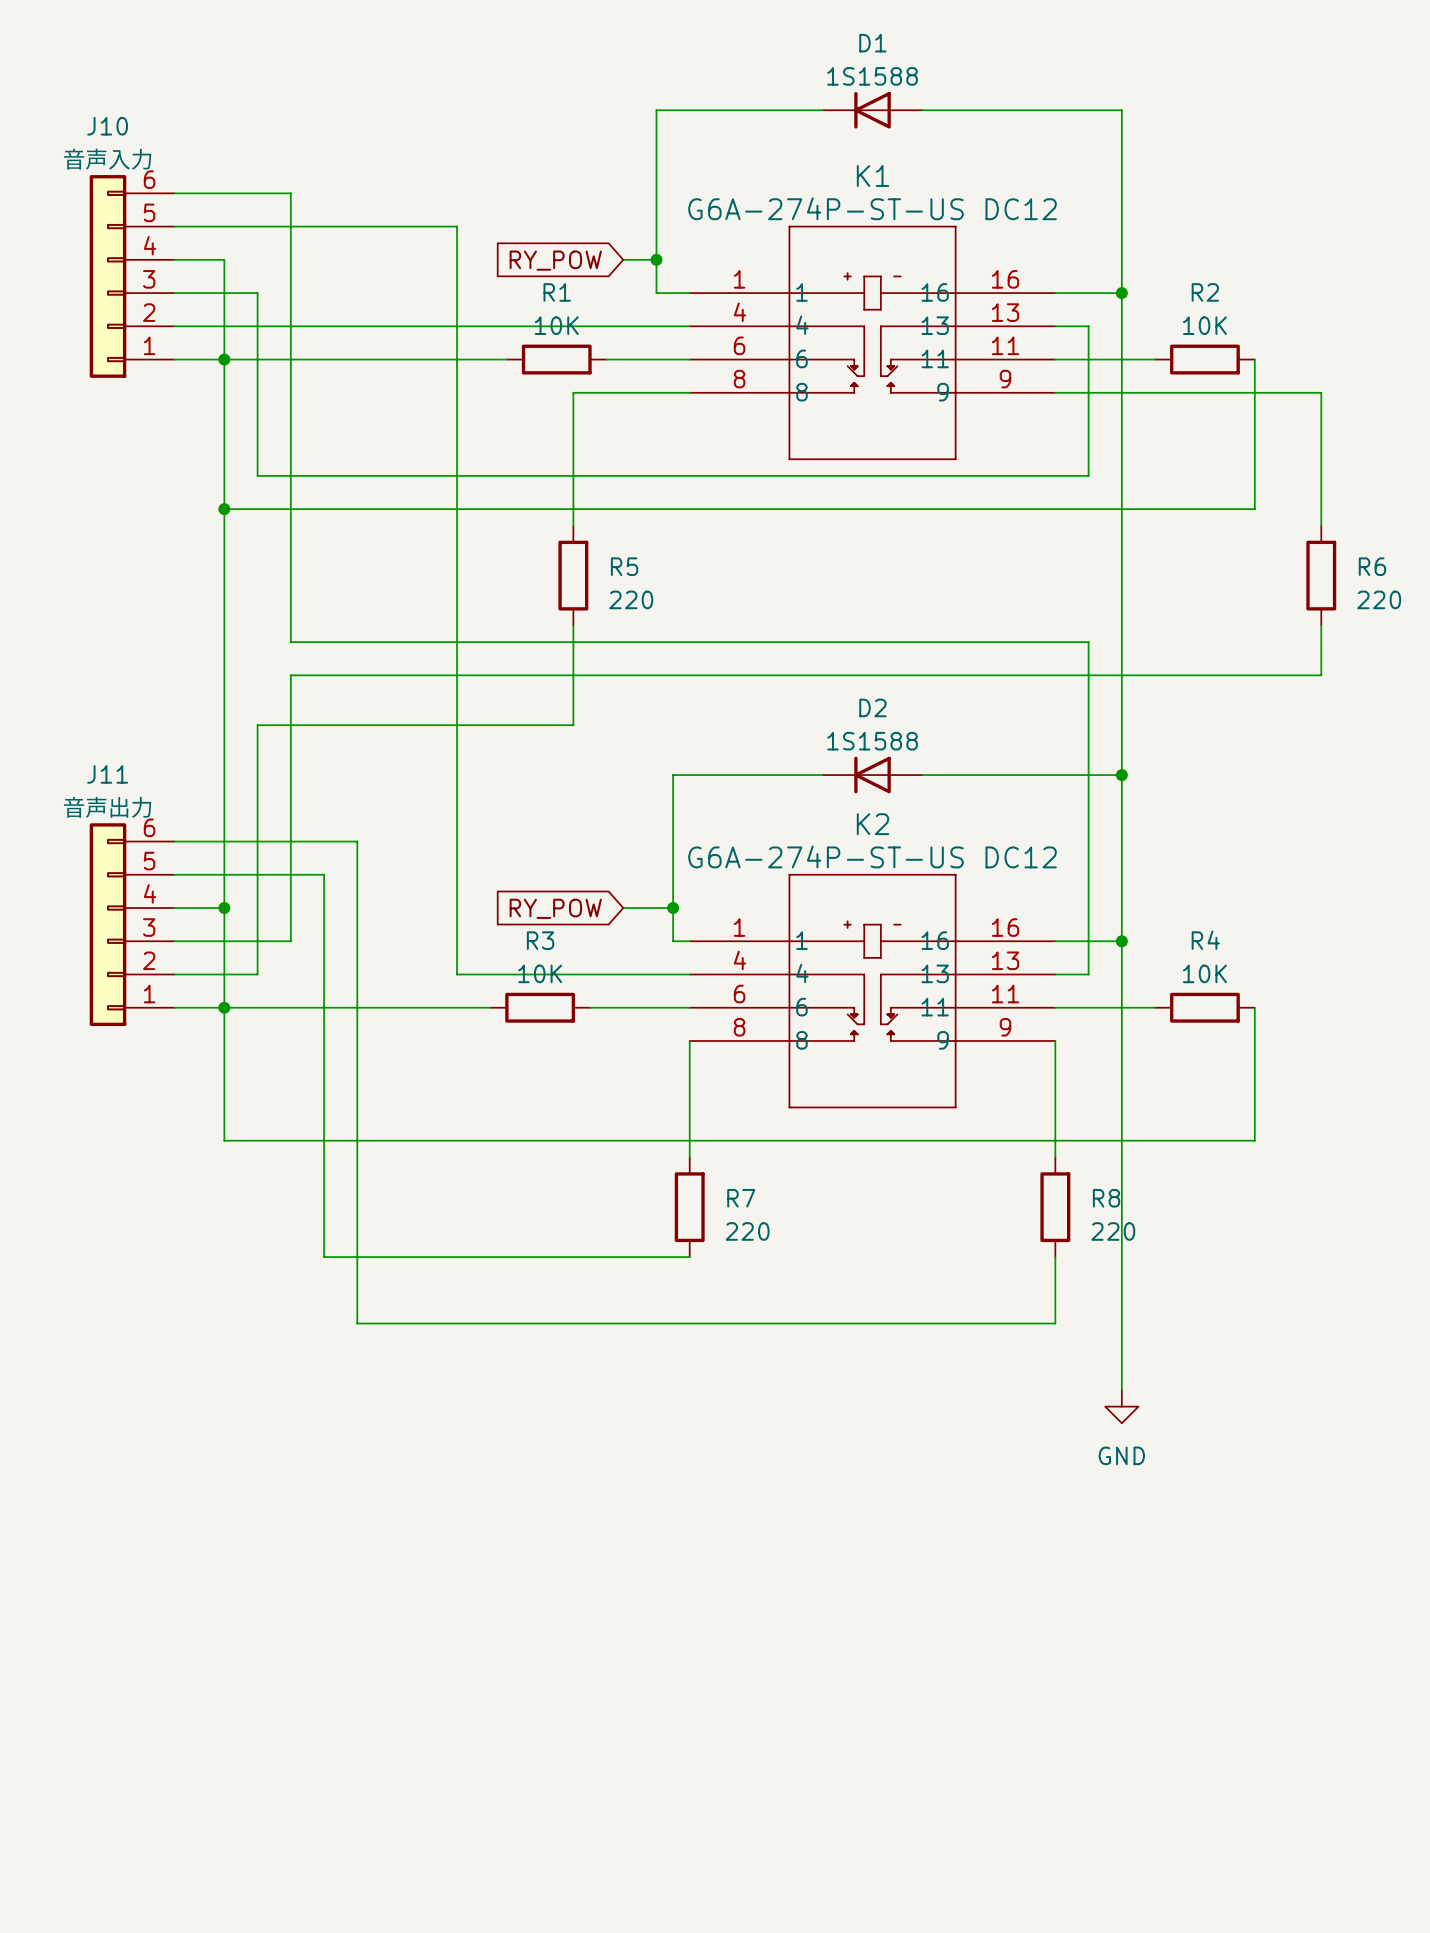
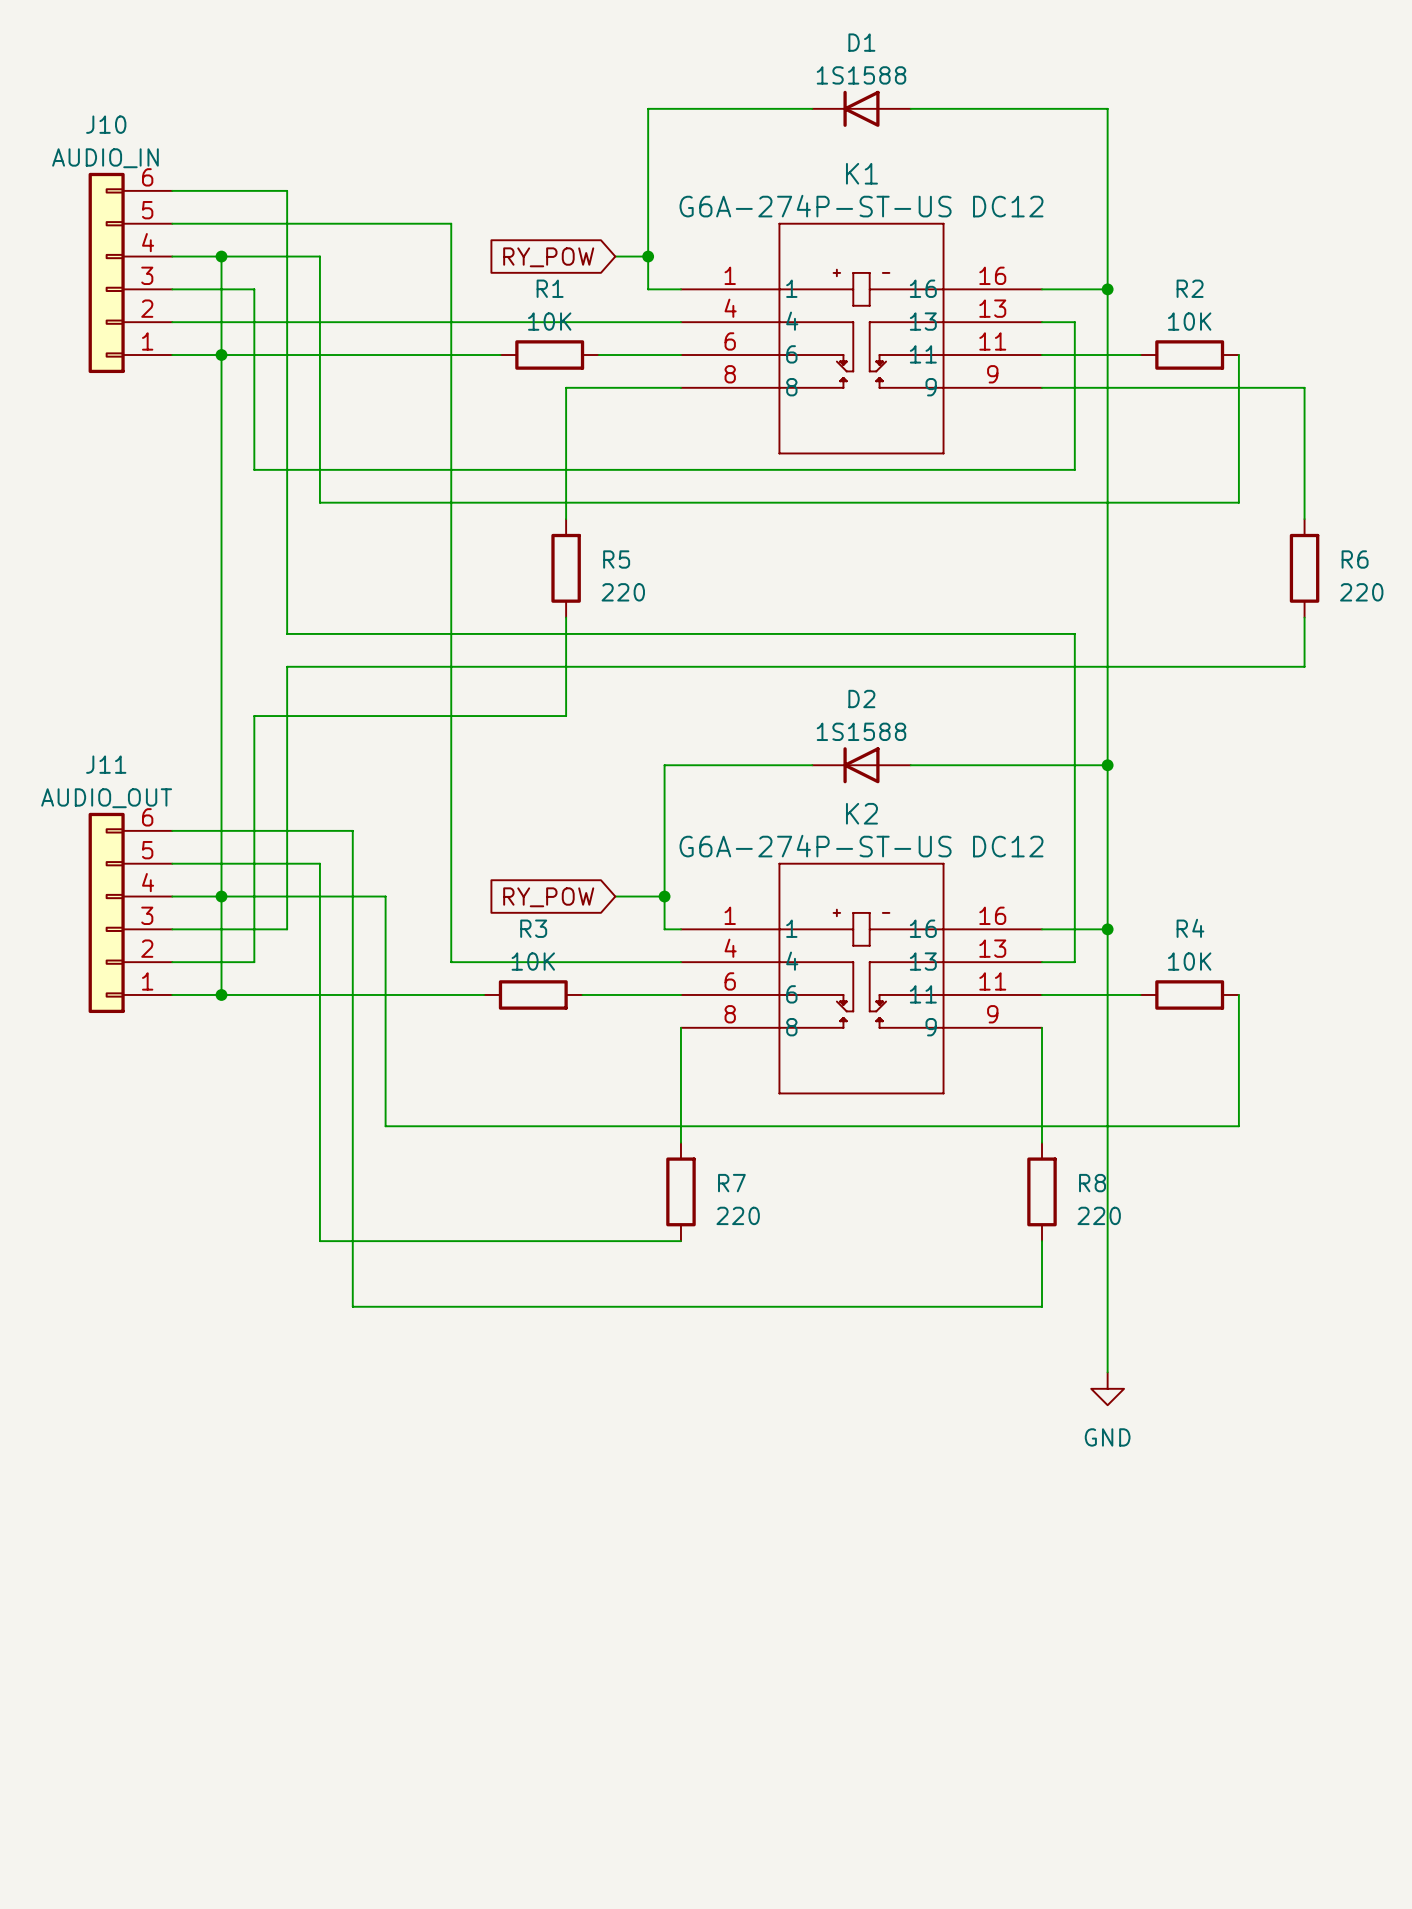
J10 value: 音声入力 (107, 159) -> AUDIO_IN (105, 158)
junction: none -> (221, 256)
wire: (224, 509) (324, 509) -> (221, 256) (319, 256) (319, 502)
junction: (224, 509) -> none
J11 value: 音声出力 (107, 807) -> AUDIO_OUT (106, 798)
wire: (224, 1007) (224, 1140) (390, 1140) -> (221, 896) (385, 896) (385, 1126)

